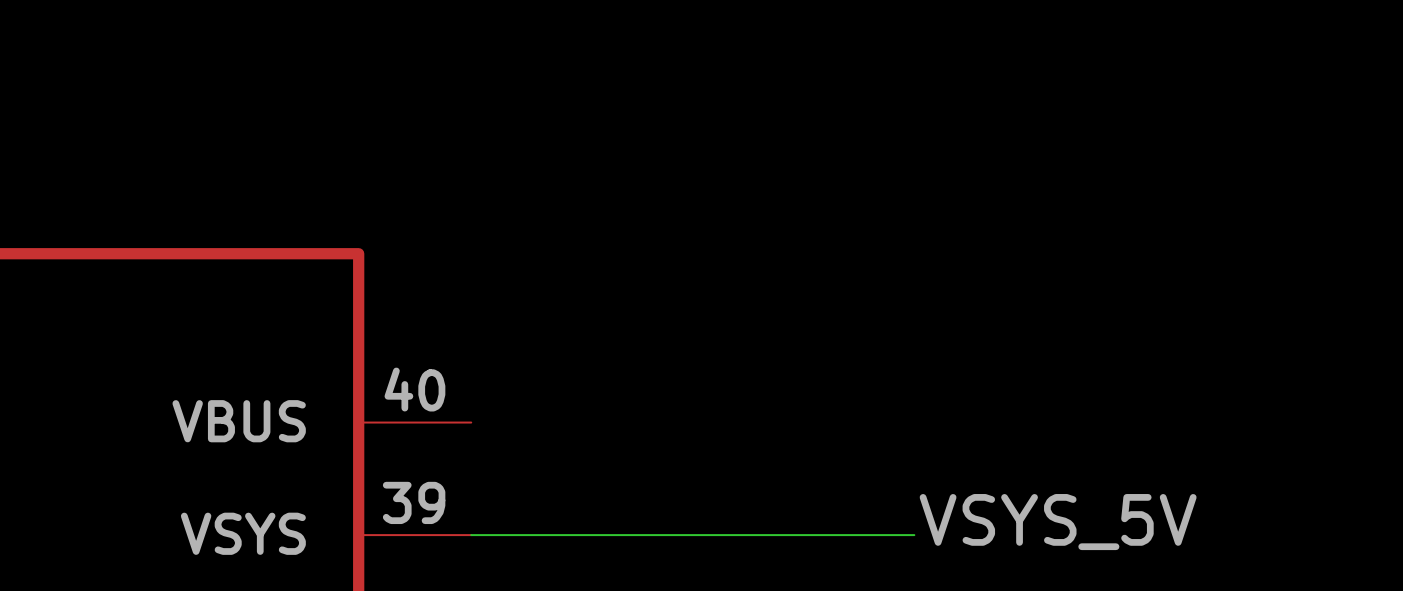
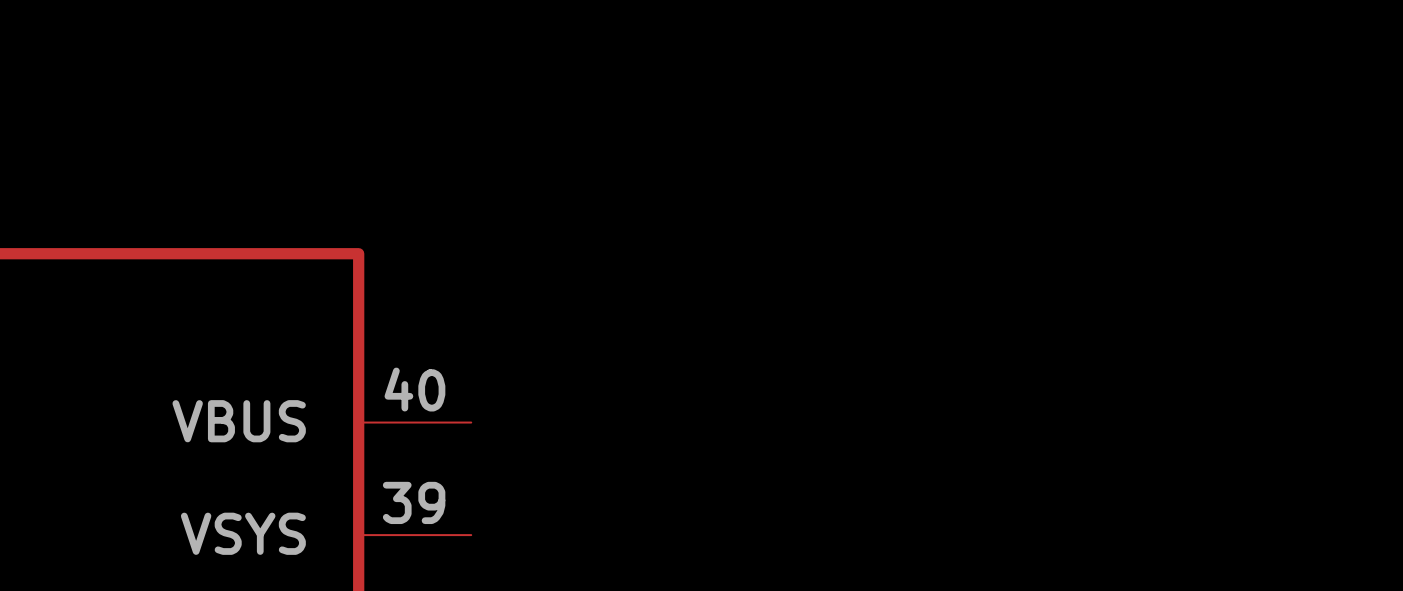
label: VSYS_5V (1058, 522) -> none
wire: (471, 535) (914, 535) -> none

